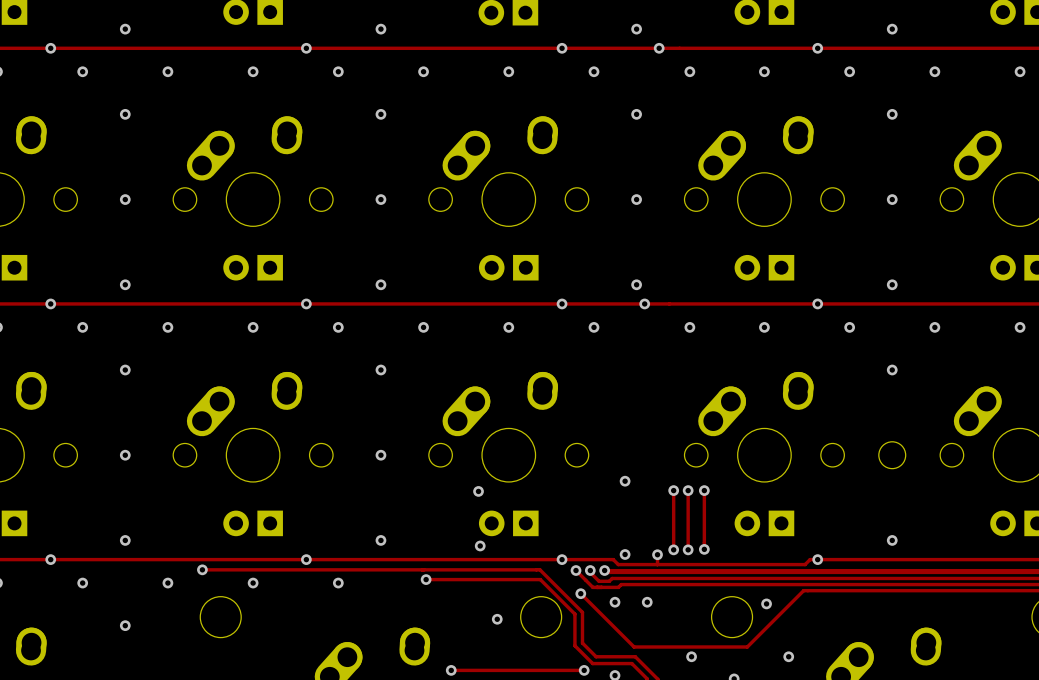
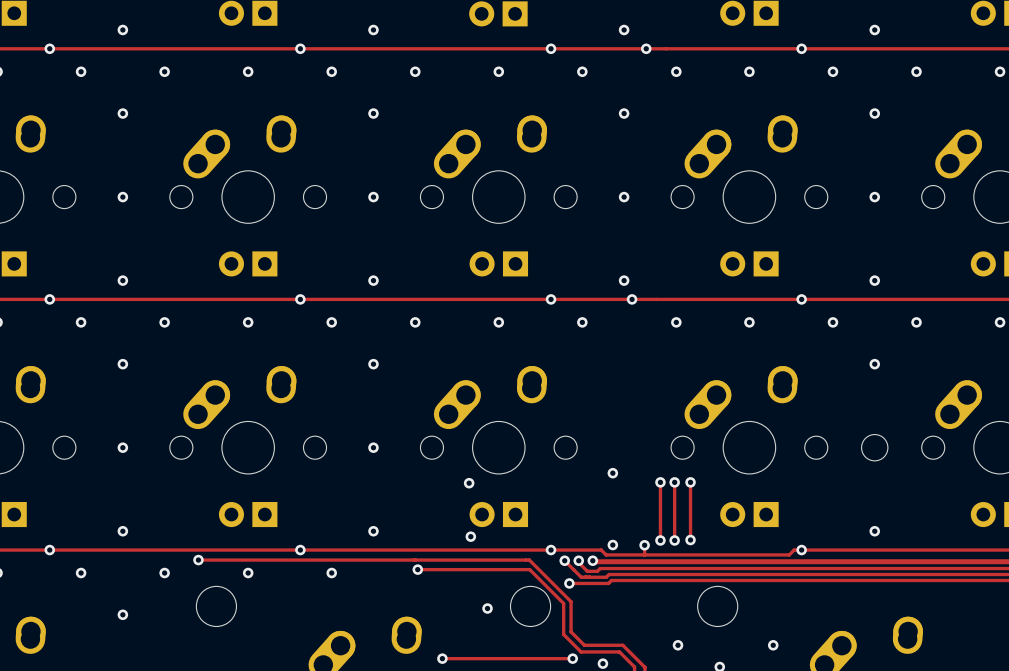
track: (803, 590) (747, 647) (634, 647) (580, 593) -> (787, 580) (611, 580) (608, 583) (569, 583)
via: (615, 602) -> none
via: (647, 602) -> none
via: (766, 603) -> none

